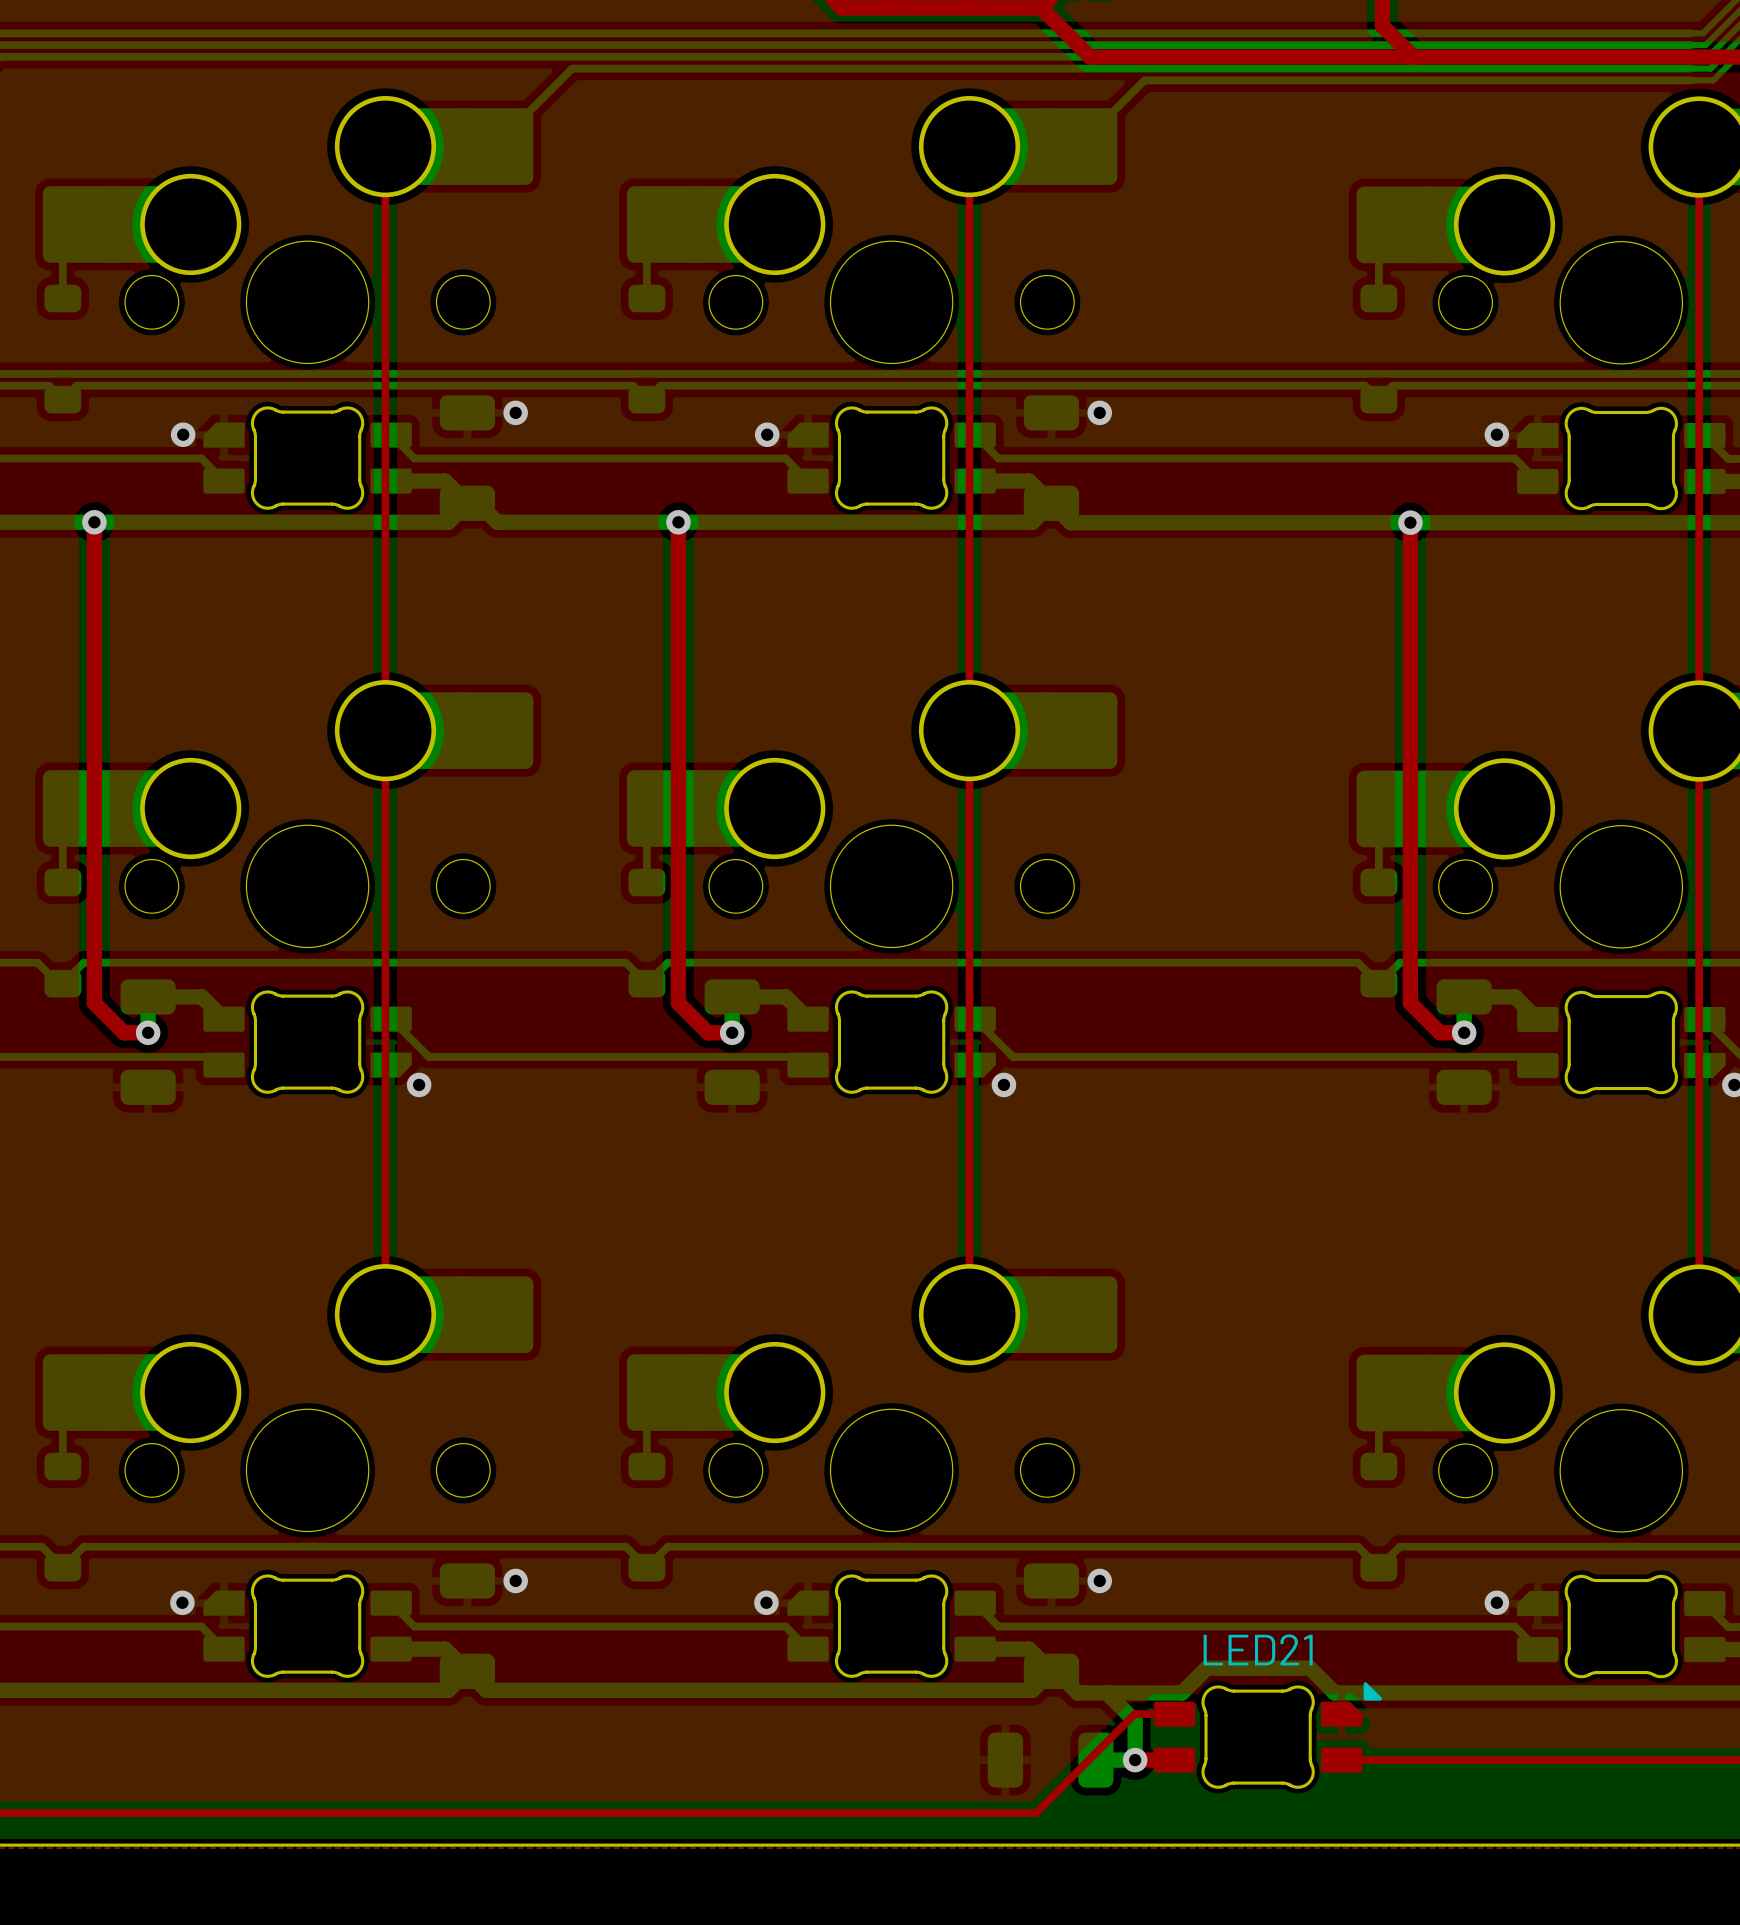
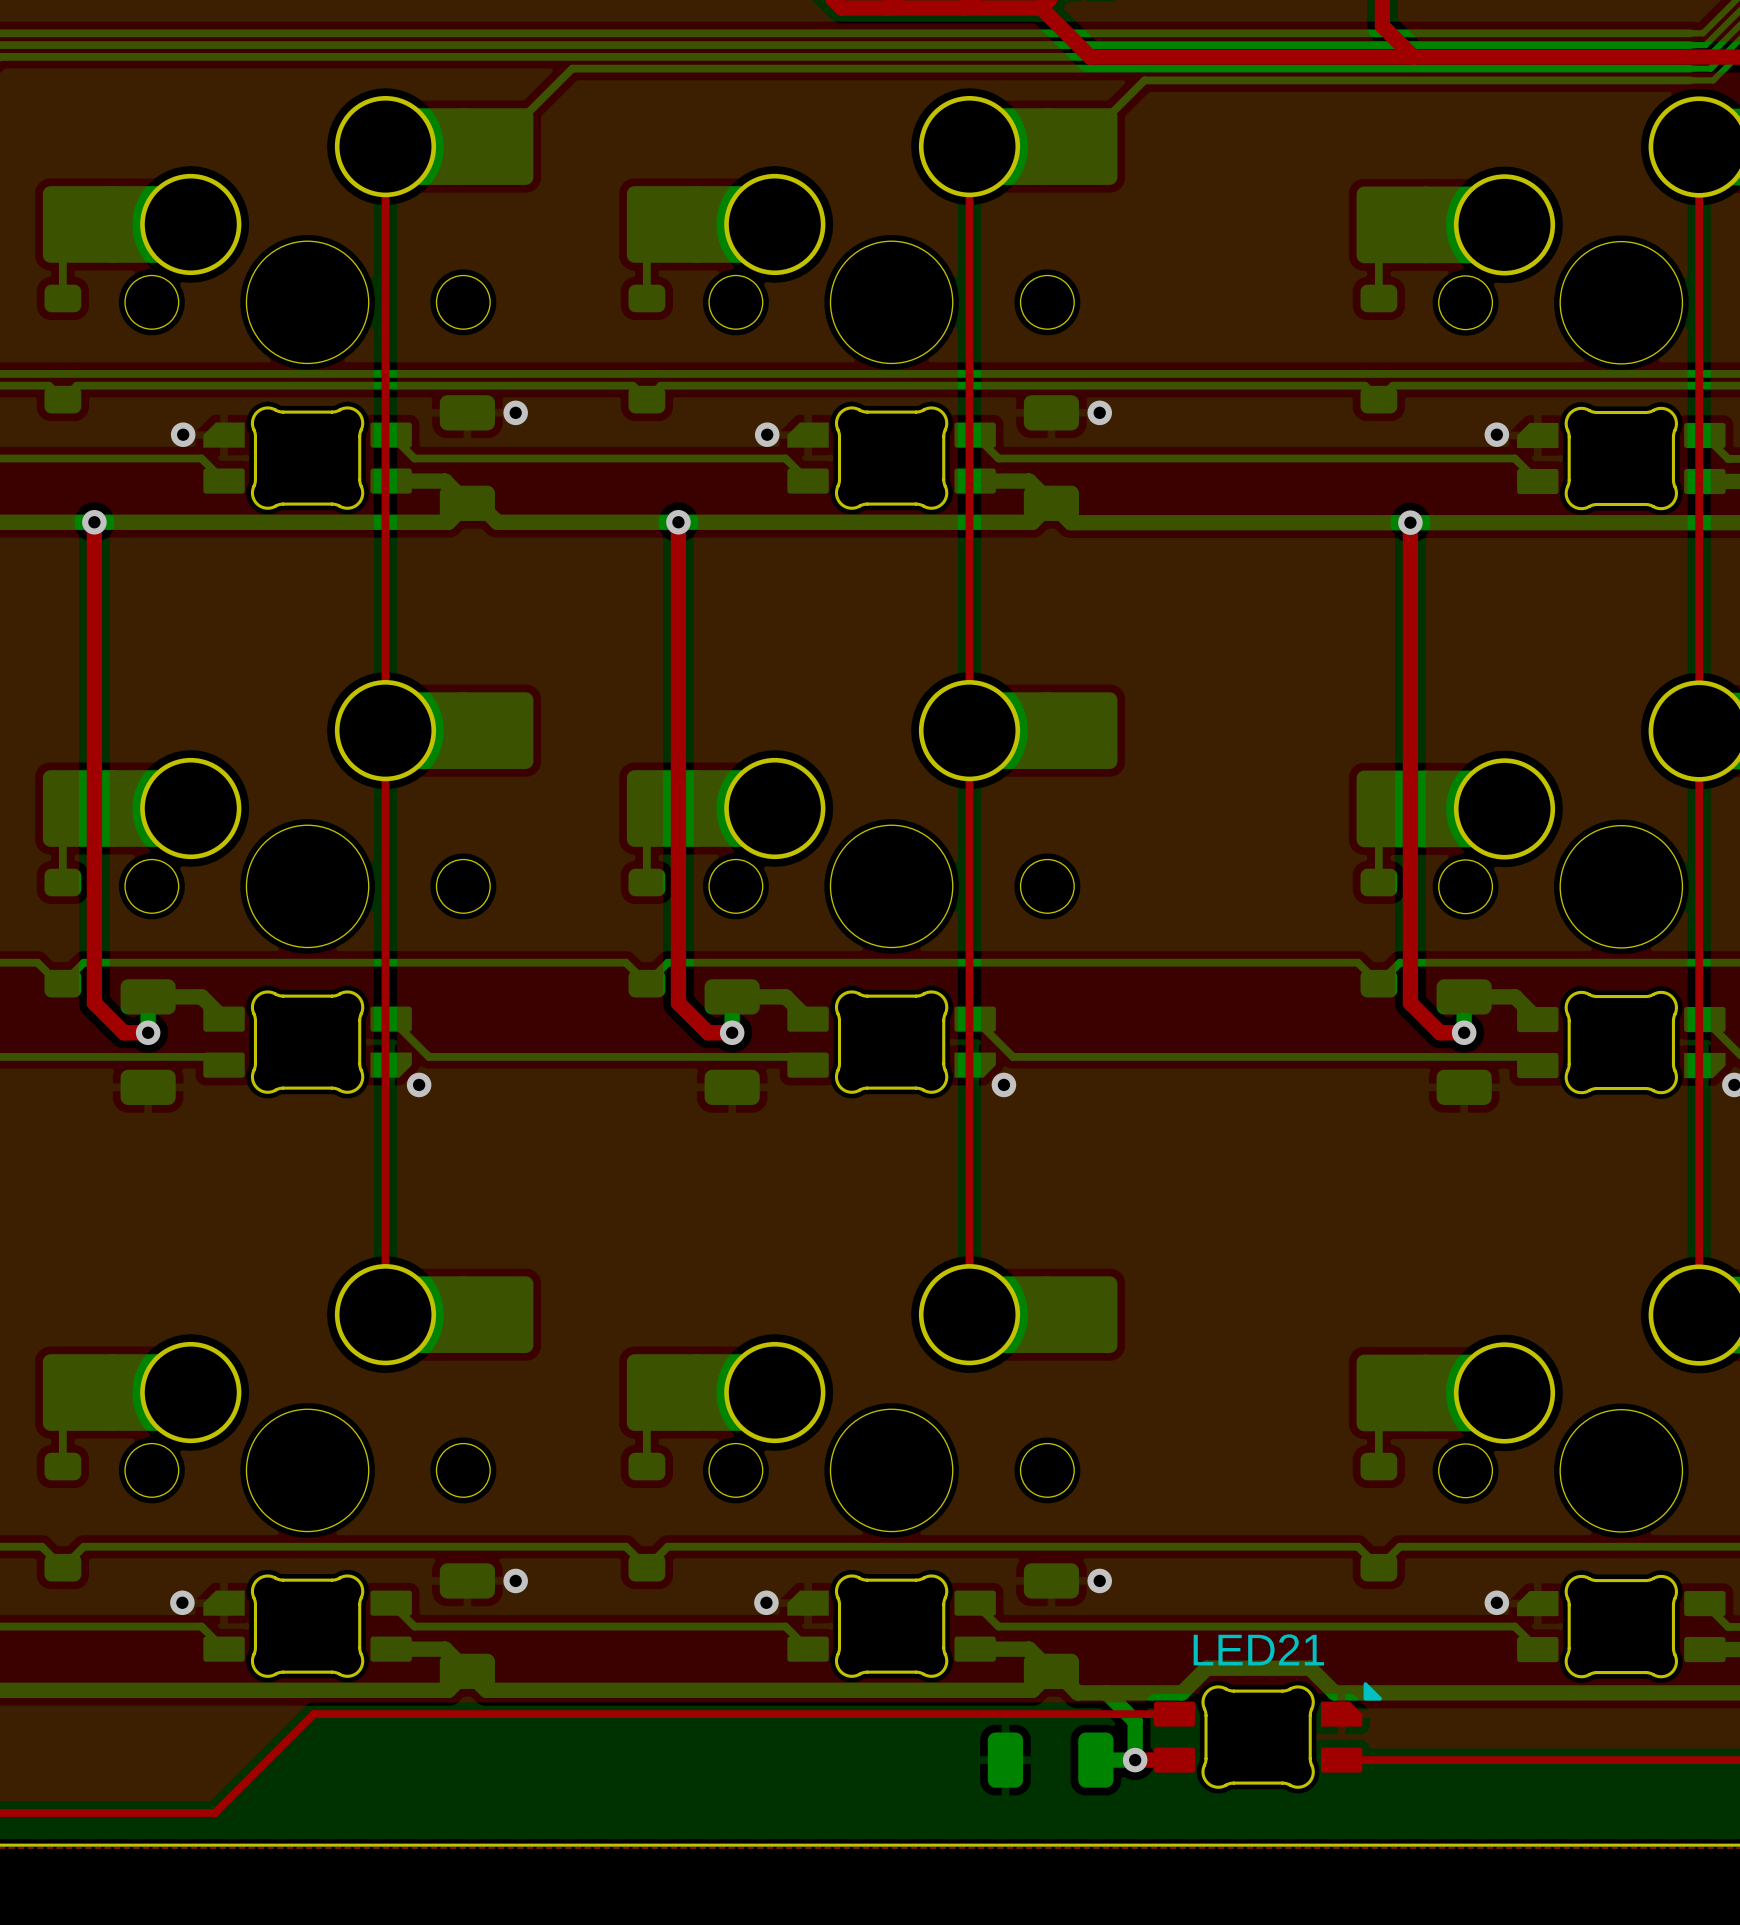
top track: (1134, 1714) (1035, 1813) (214, 1813) -> (1134, 1714) (313, 1714) (214, 1813)

